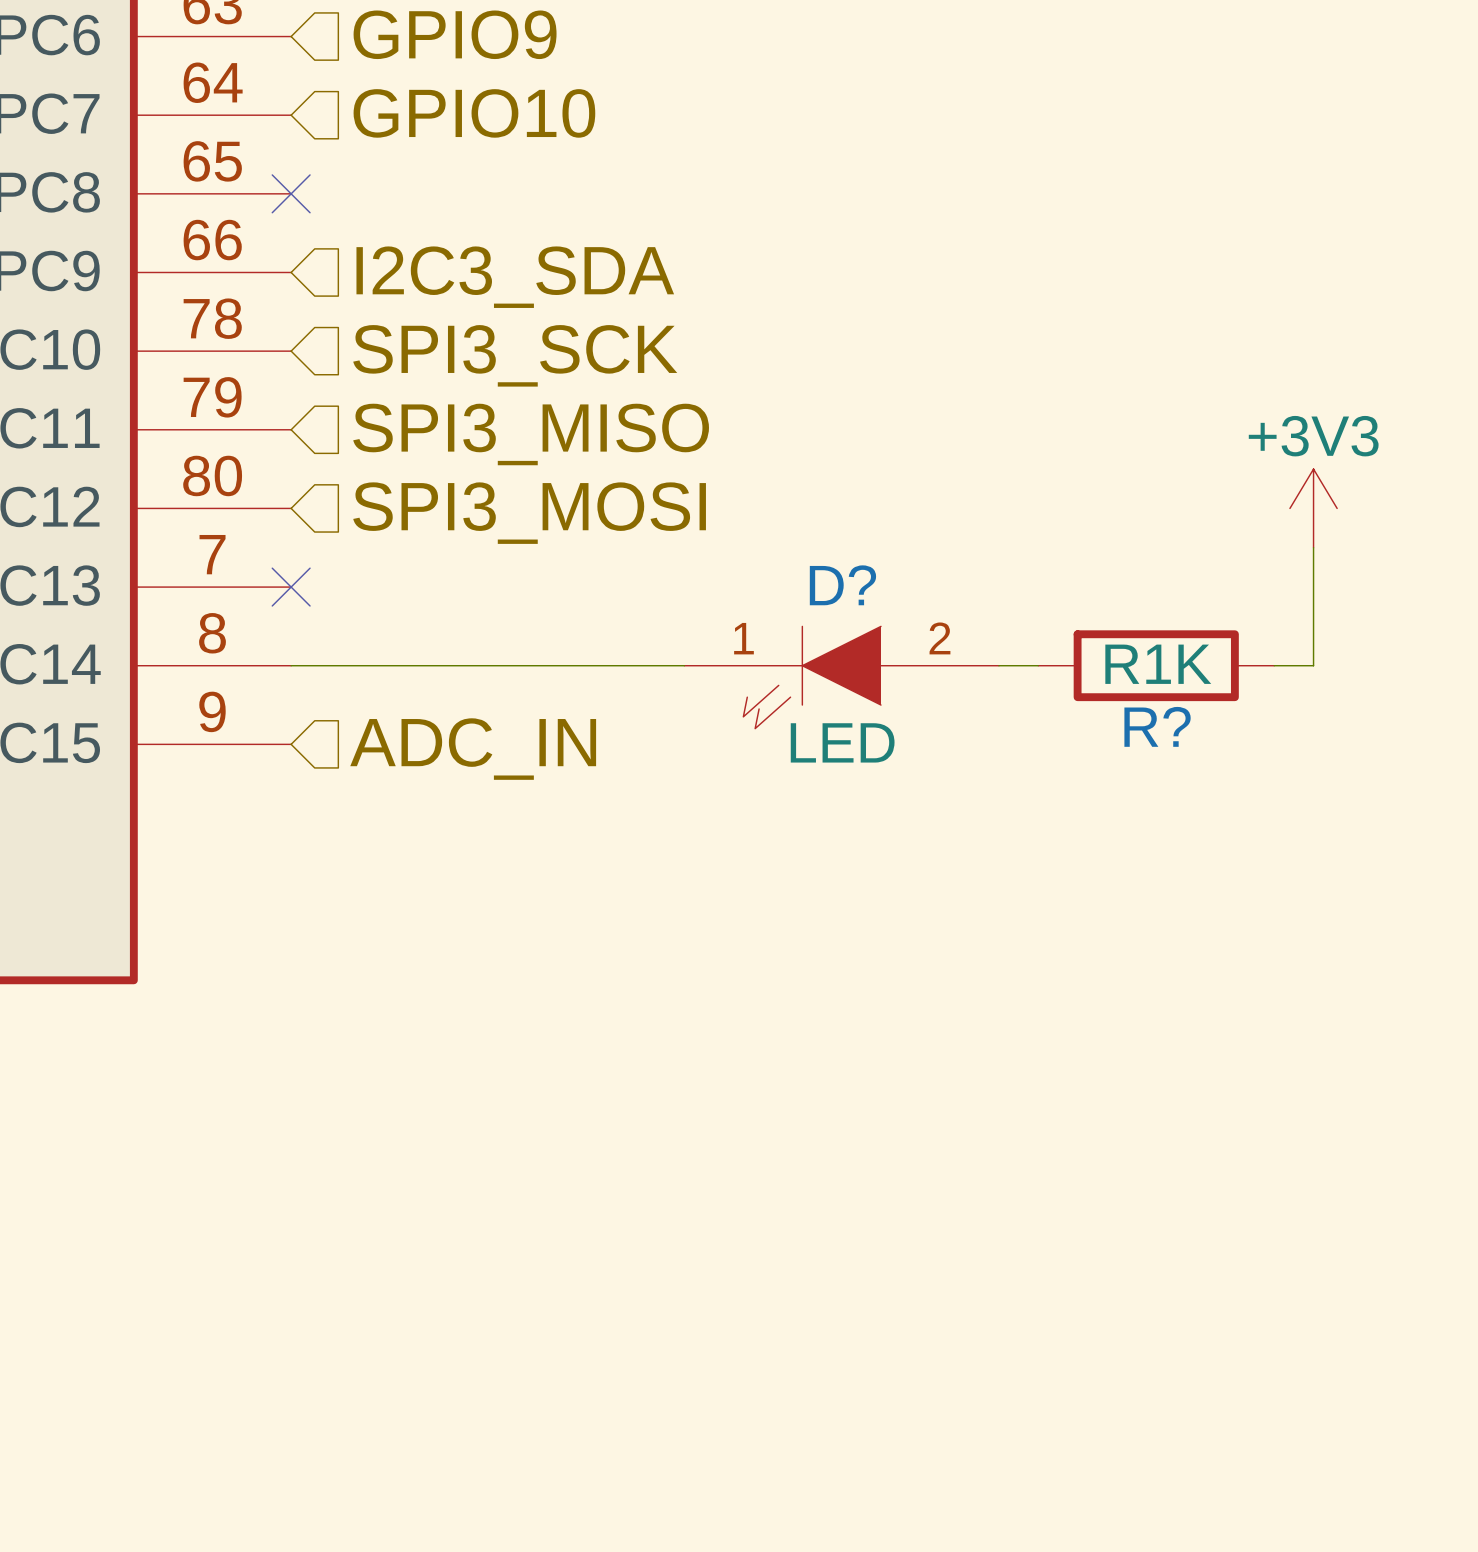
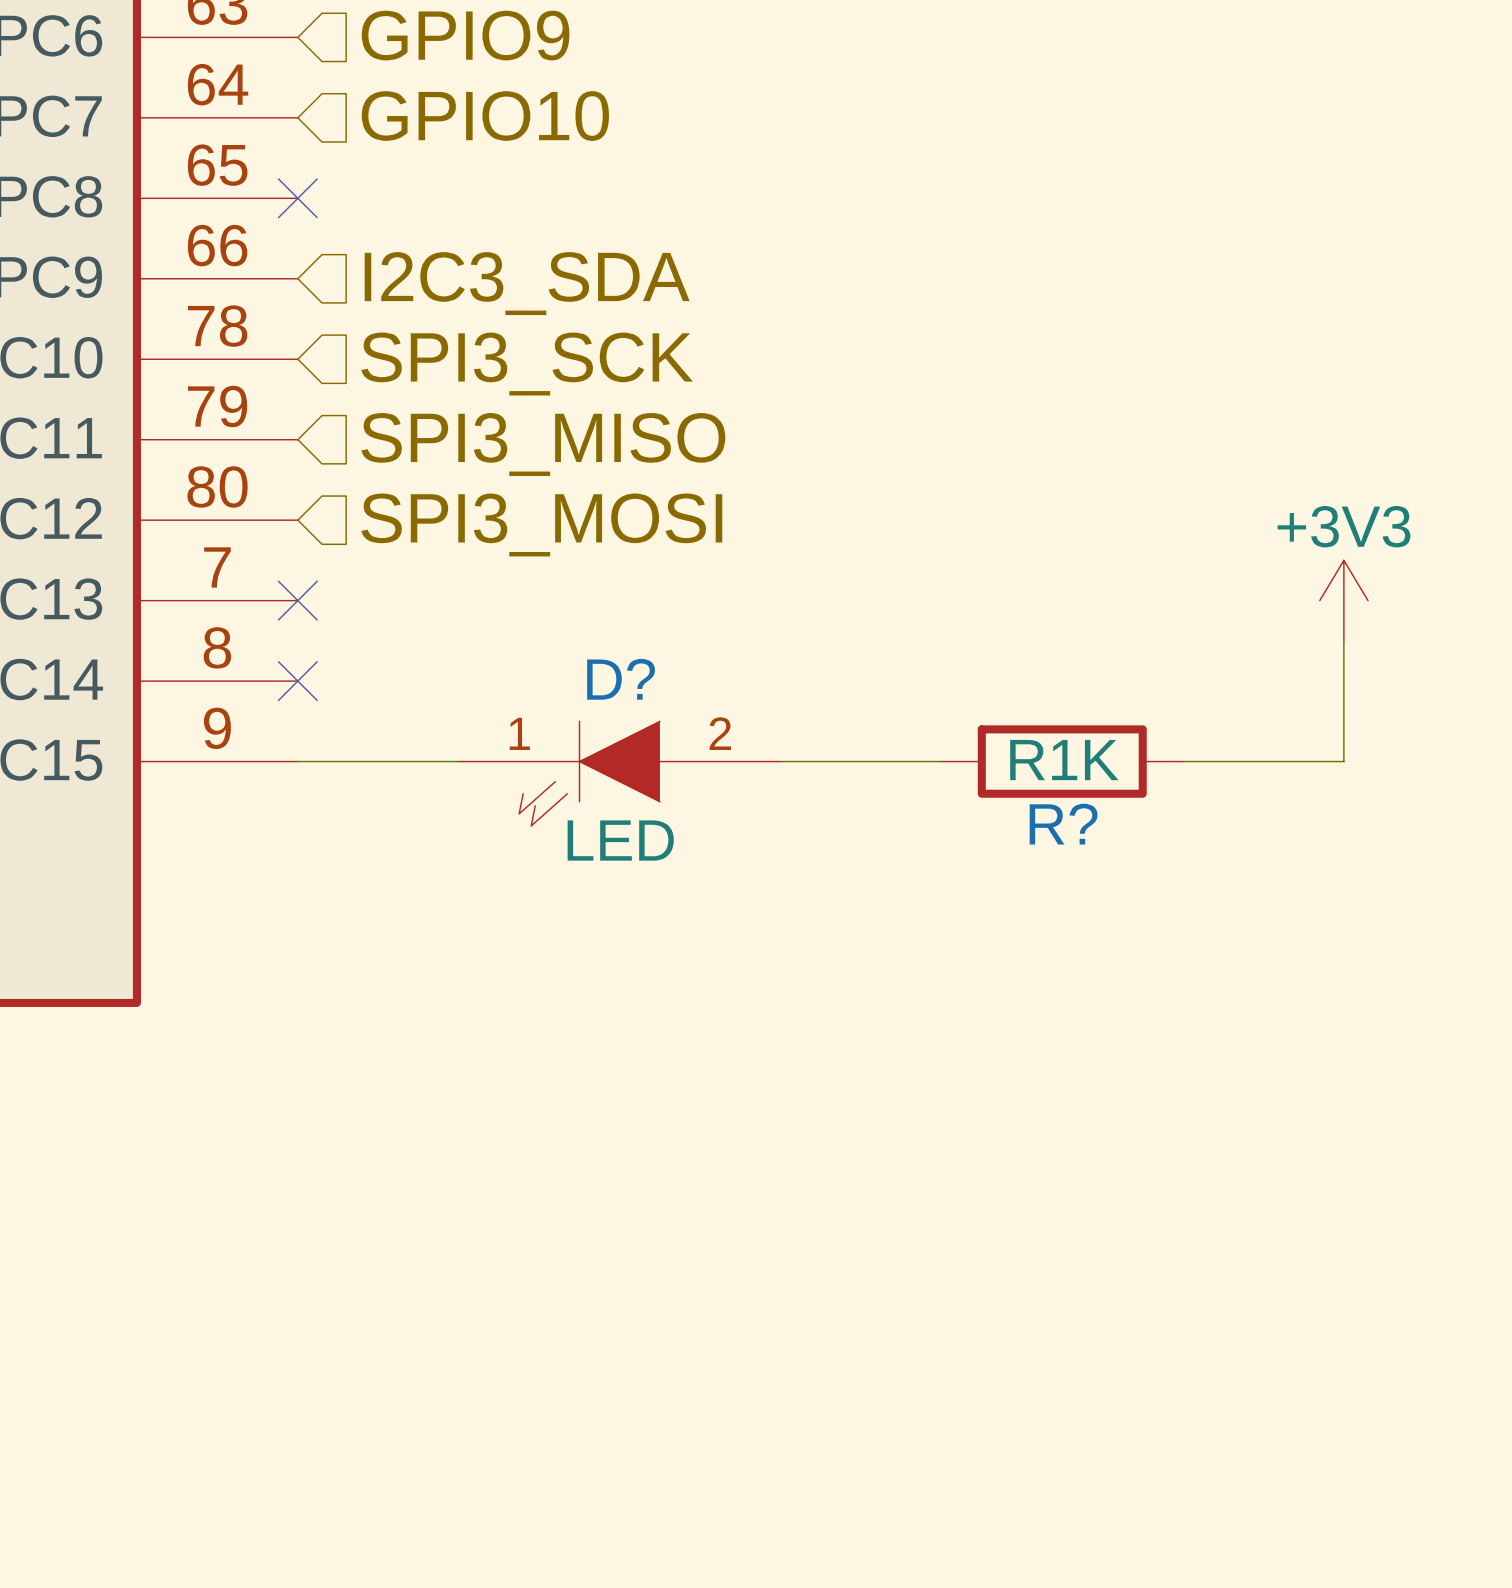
power symbol position: +3V3 (1313, 508) -> +3V3 (1343, 600)
wire: (291, 665) (684, 665) -> none
no-connect mark: none -> (297, 681)
wire: (998, 665) (1038, 665) -> none
R? position: (1156, 665) -> (1062, 761)
wire: (1274, 665) (1313, 665) -> (1182, 761) (1343, 761) (1343, 681)
D? position: (841, 677) -> (619, 773)
wire: none -> (297, 761) (458, 761)
wire: none -> (780, 761) (941, 761)
hierarchical label: ADC_IN (473, 749) -> none

